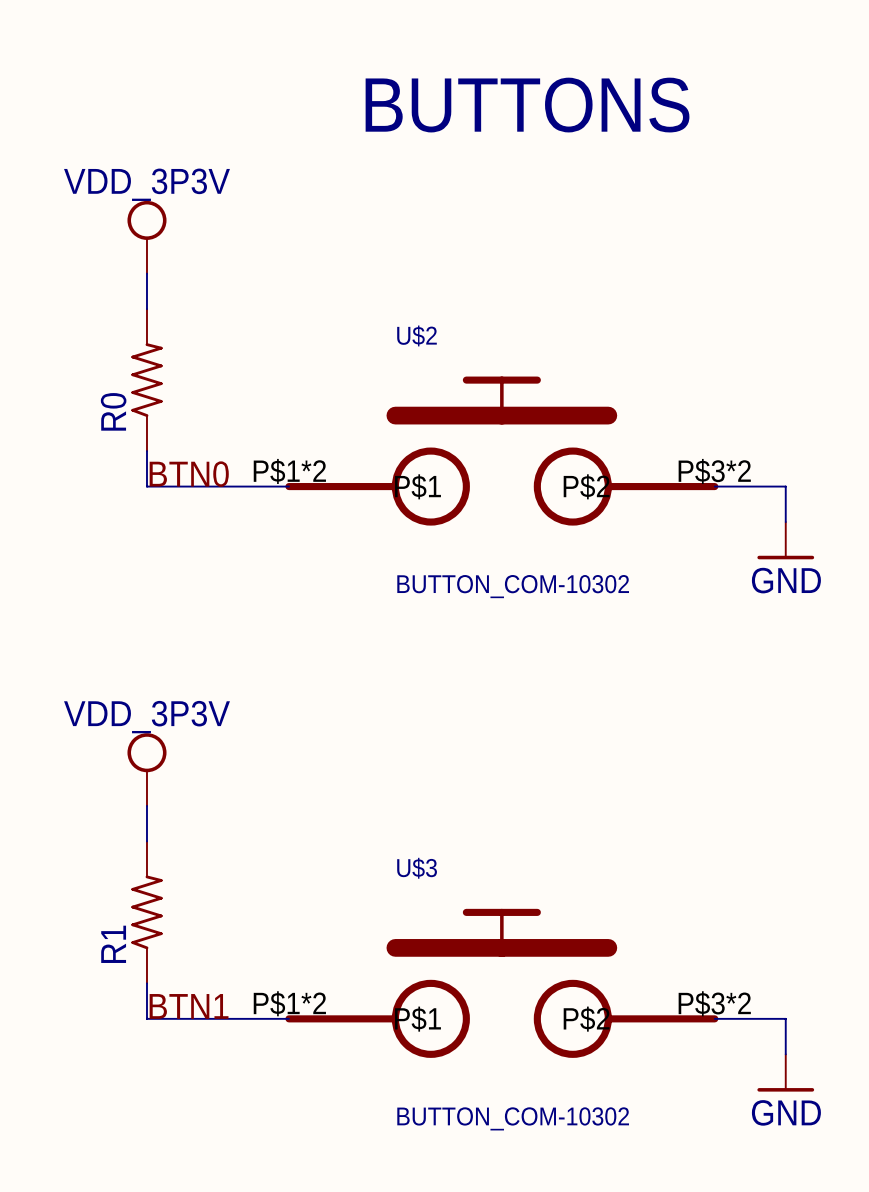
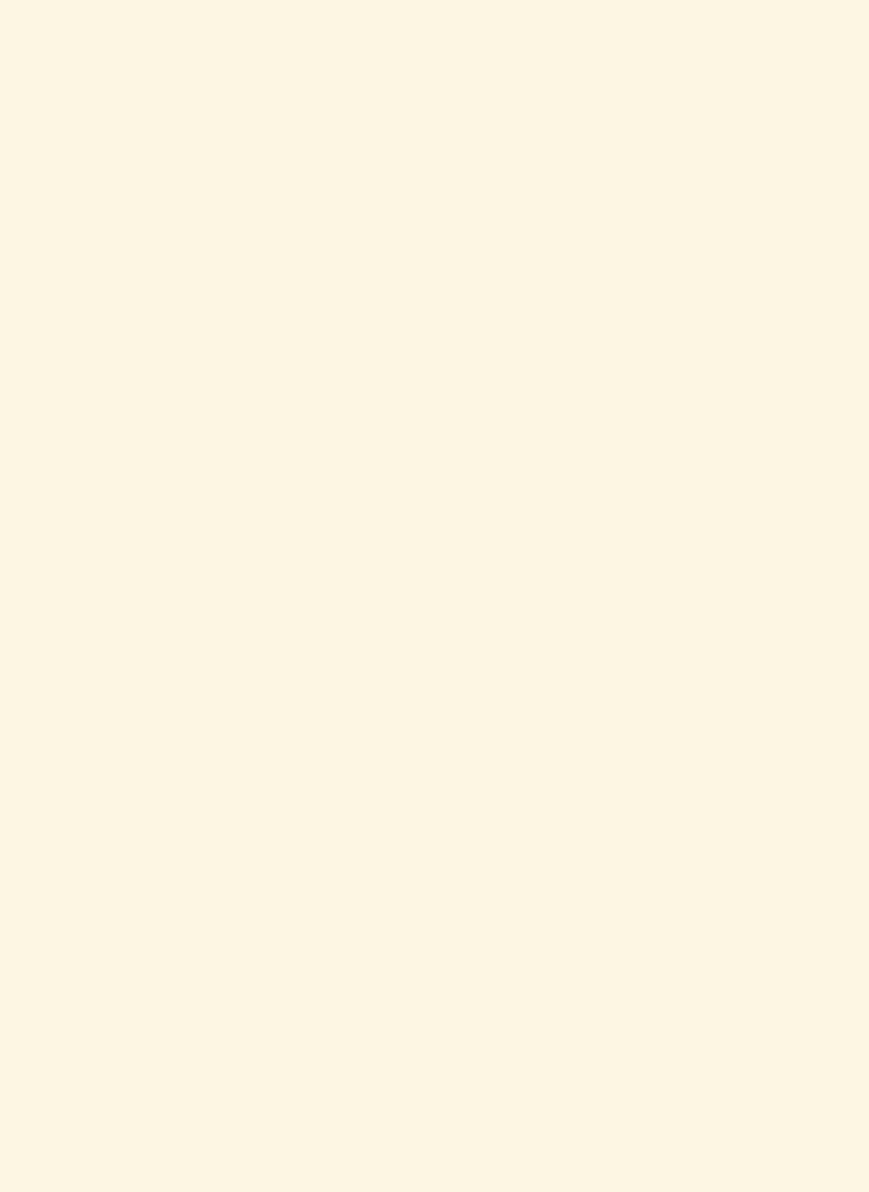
text: BUTTONS (527, 105) -> none
power symbol: VDD_3P3V (146, 237) -> none
wire: (146, 273) (146, 309) -> none
R0: (146, 380) -> none
wire: (146, 451) (146, 486) (288, 486) -> none
U$2: BUTTON_COM-10302 (501, 451) -> none
label: BTN0 (189, 474) -> none
wire: (714, 486) (785, 486) (785, 522) -> none
power symbol: GND (785, 540) -> none
power symbol: VDD_3P3V (146, 769) -> none
wire: (146, 805) (146, 841) -> none
R1: (146, 912) -> none
wire: (146, 983) (146, 1018) (288, 1018) -> none
U$3: BUTTON_COM-10302 (501, 983) -> none
label: BTN1 (189, 1006) -> none
wire: (714, 1018) (785, 1018) (785, 1054) -> none
power symbol: GND (785, 1072) -> none

